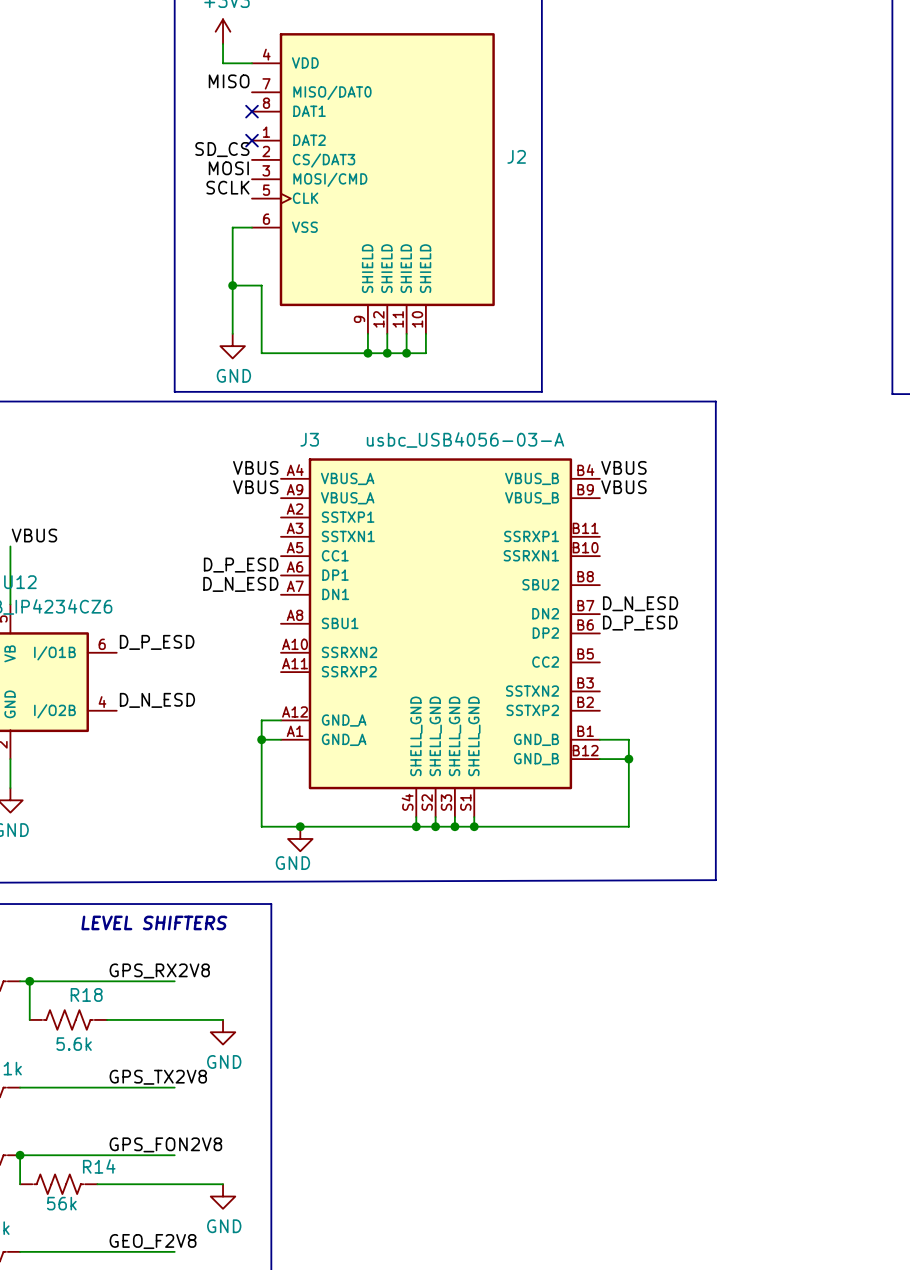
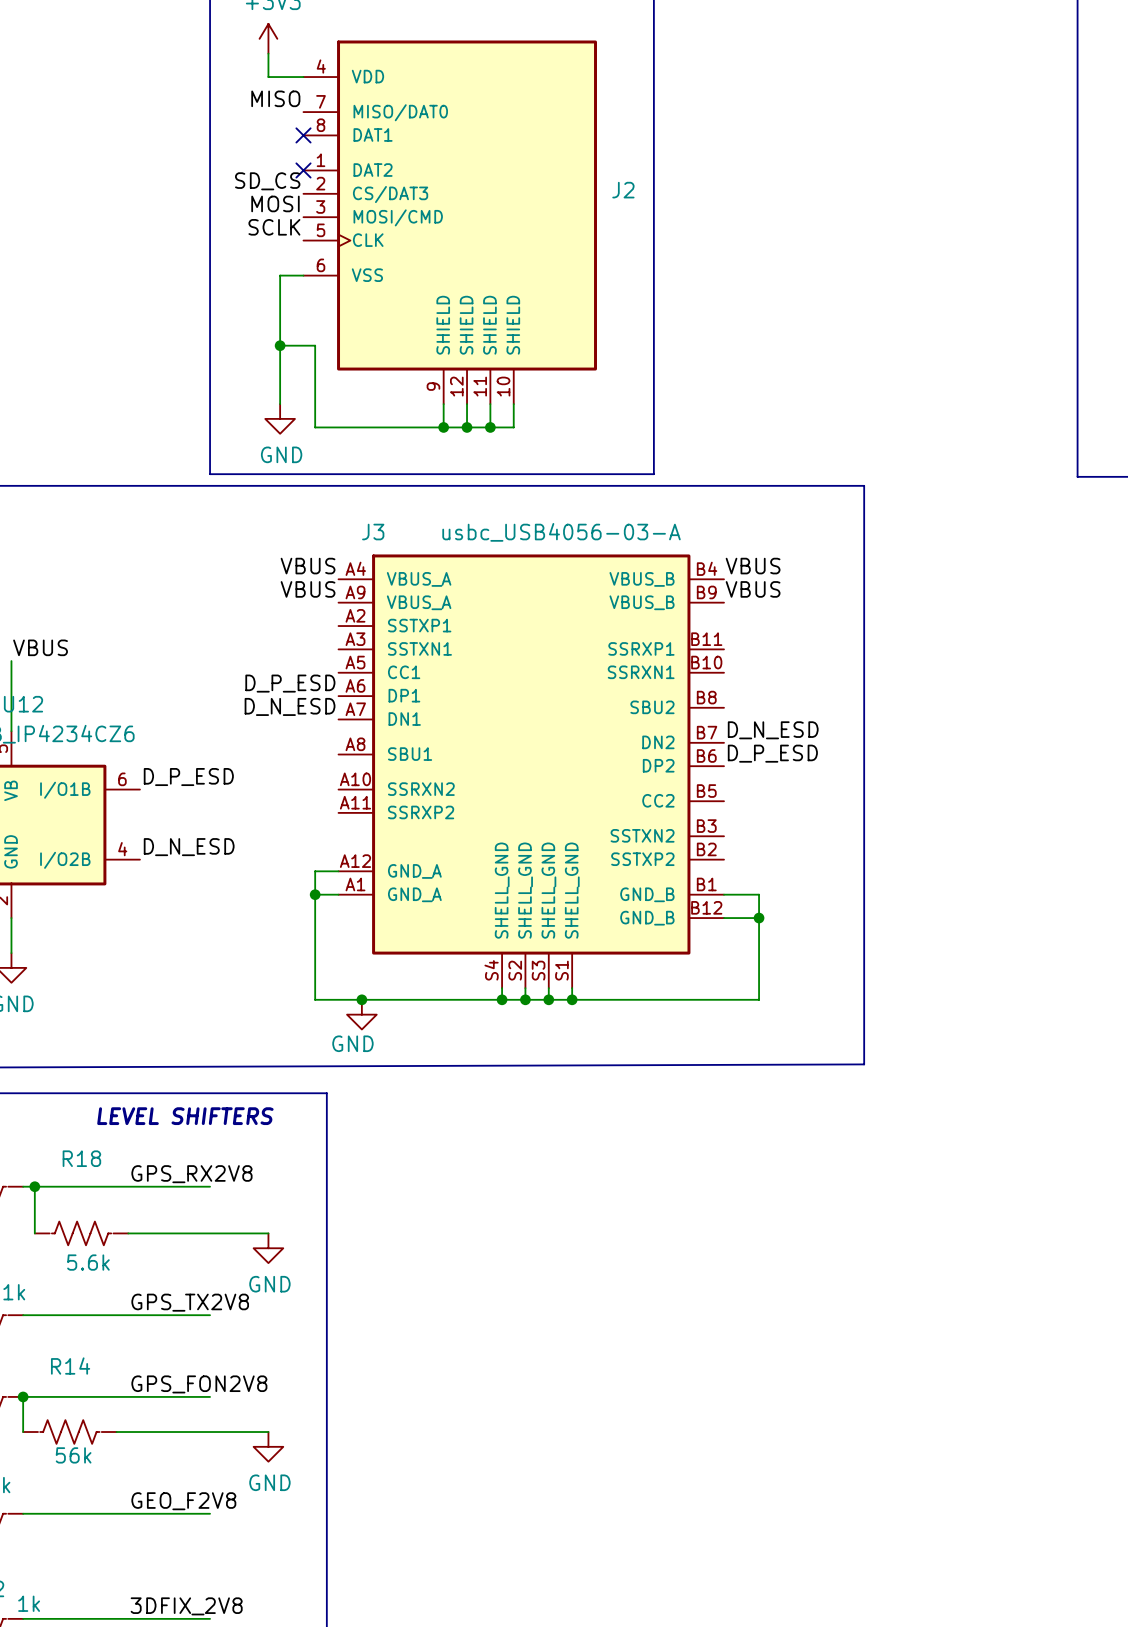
R18 name position: R18 (86, 994) -> R18 (81, 1158)
R14 name position: R14 (99, 1166) -> R14 (70, 1366)

